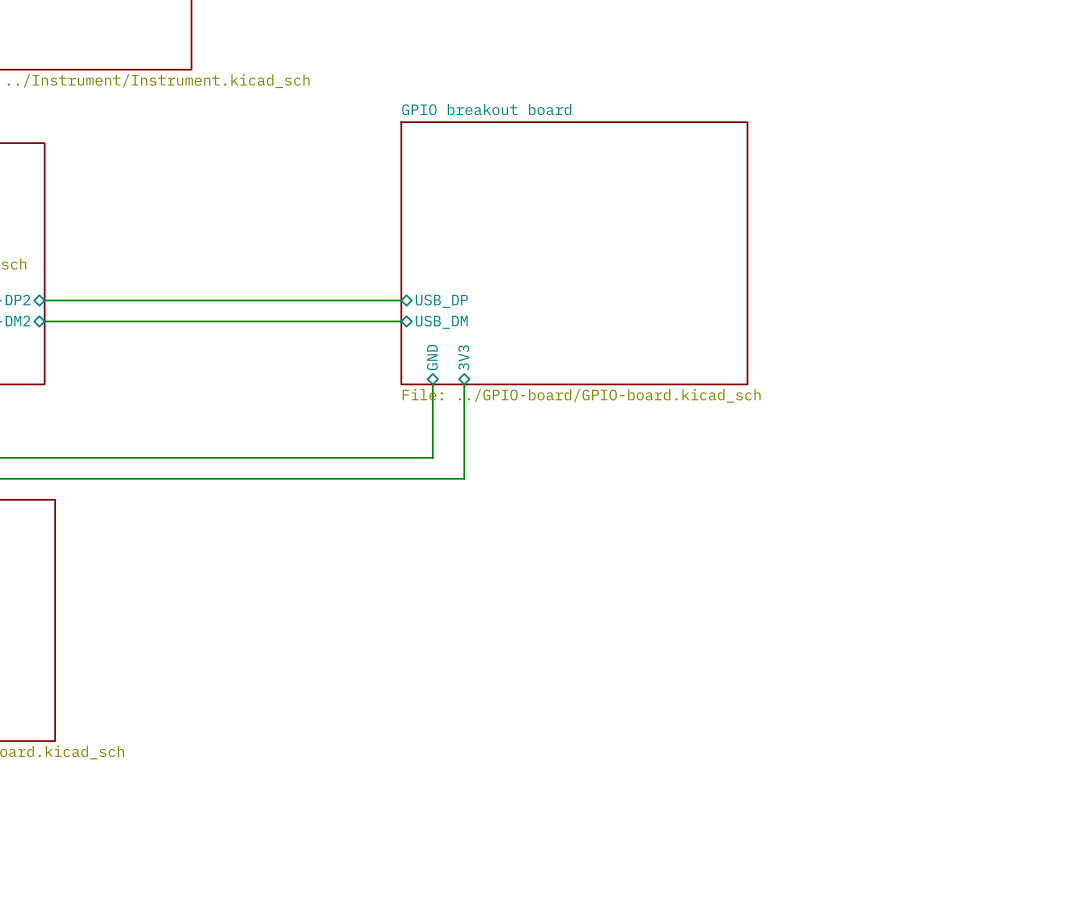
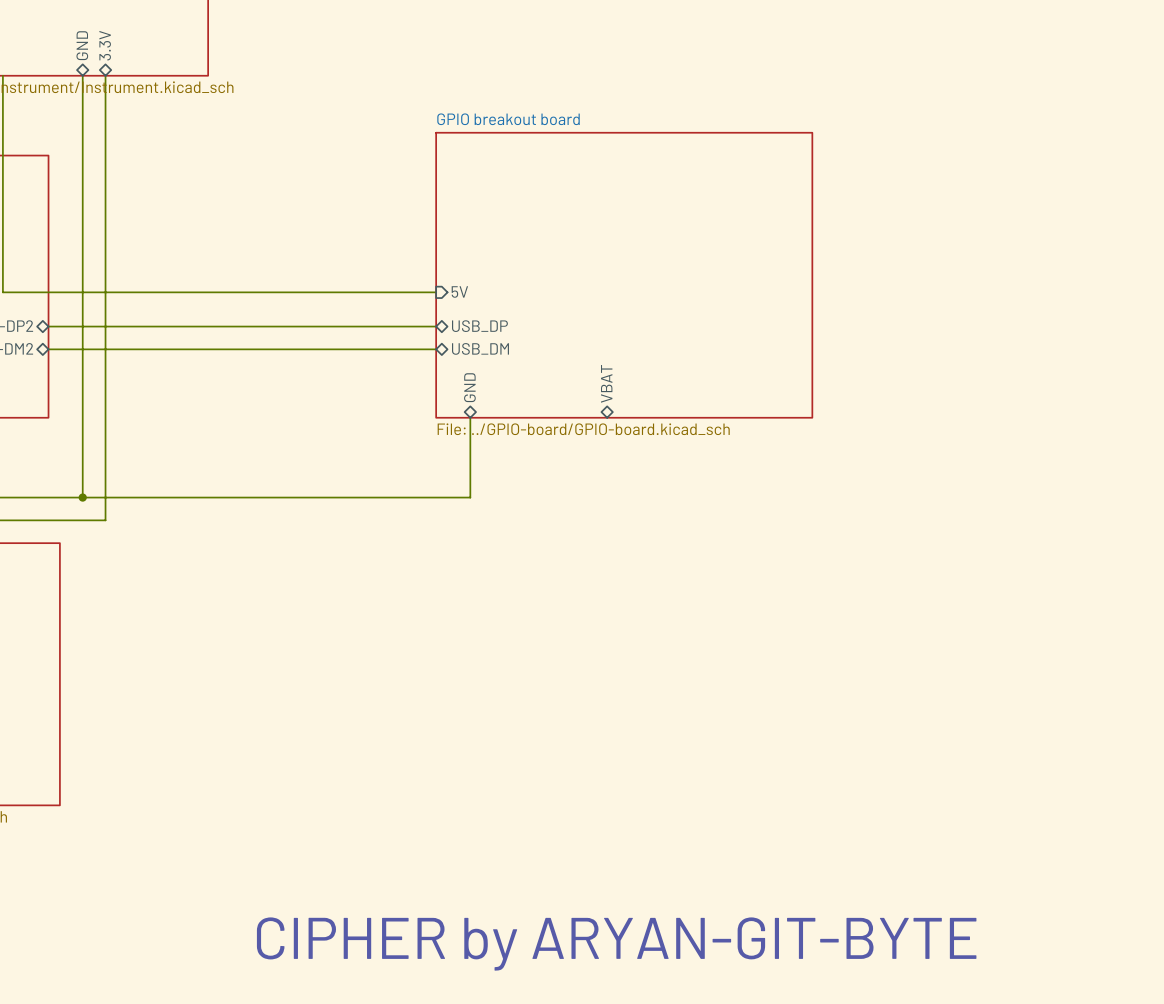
sheet pin: none -> 3.3V (105, 45)
sheet pin: none -> GND (82, 45)
wire: none -> (2, 75) (2, 292) (436, 292)
wire: none -> (82, 75) (82, 497)
sheet pin: none -> 5V (459, 291)
sheet pin: none -> VBAT (606, 383)
sheet pin: 3V3 (463, 357) -> none
wire: (464, 384) (464, 478) (97, 478) -> (105, 75) (105, 520)
junction: none -> (82, 497)
text: none -> CIPHER by ARYAN-GIT-BYTE (616, 944)

